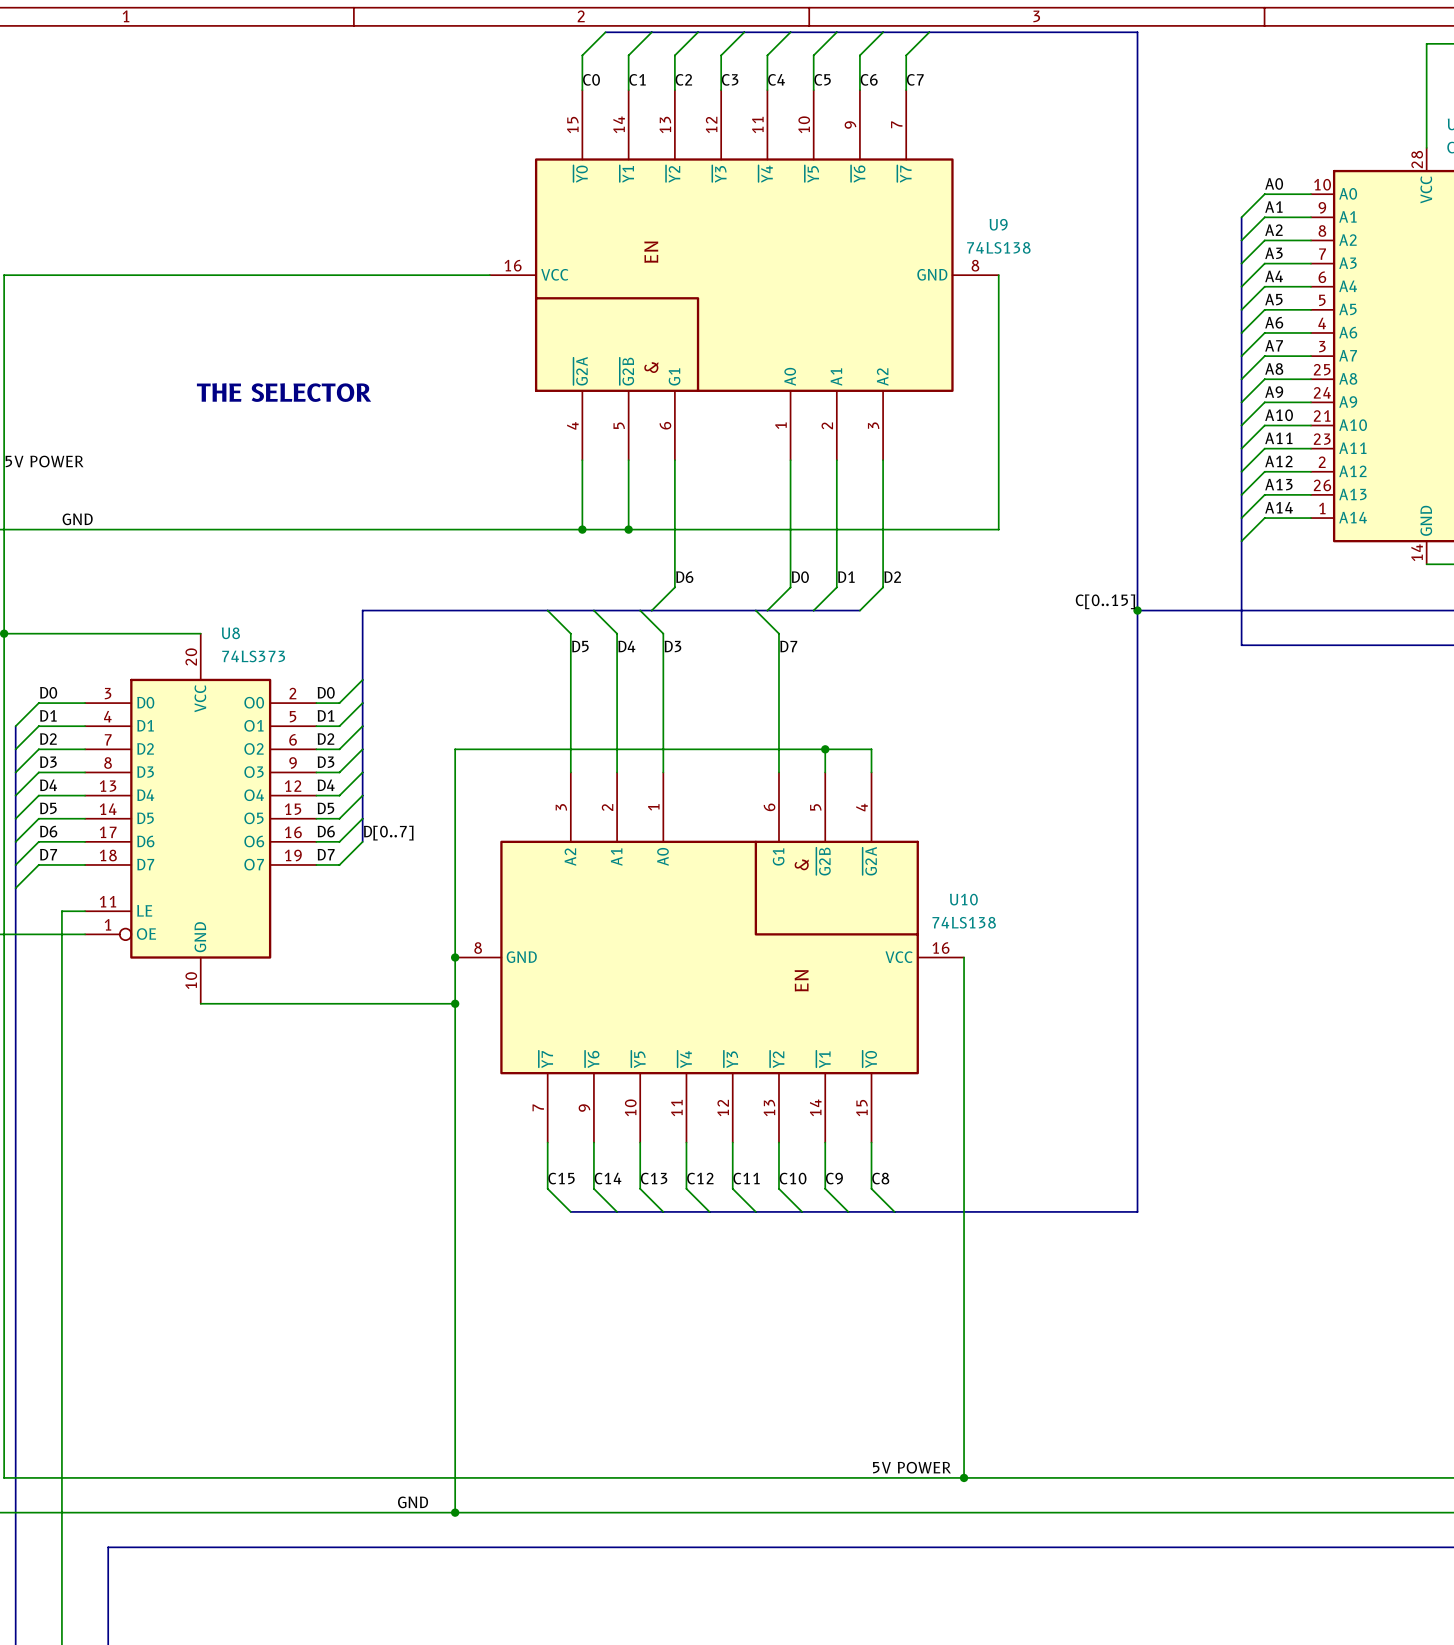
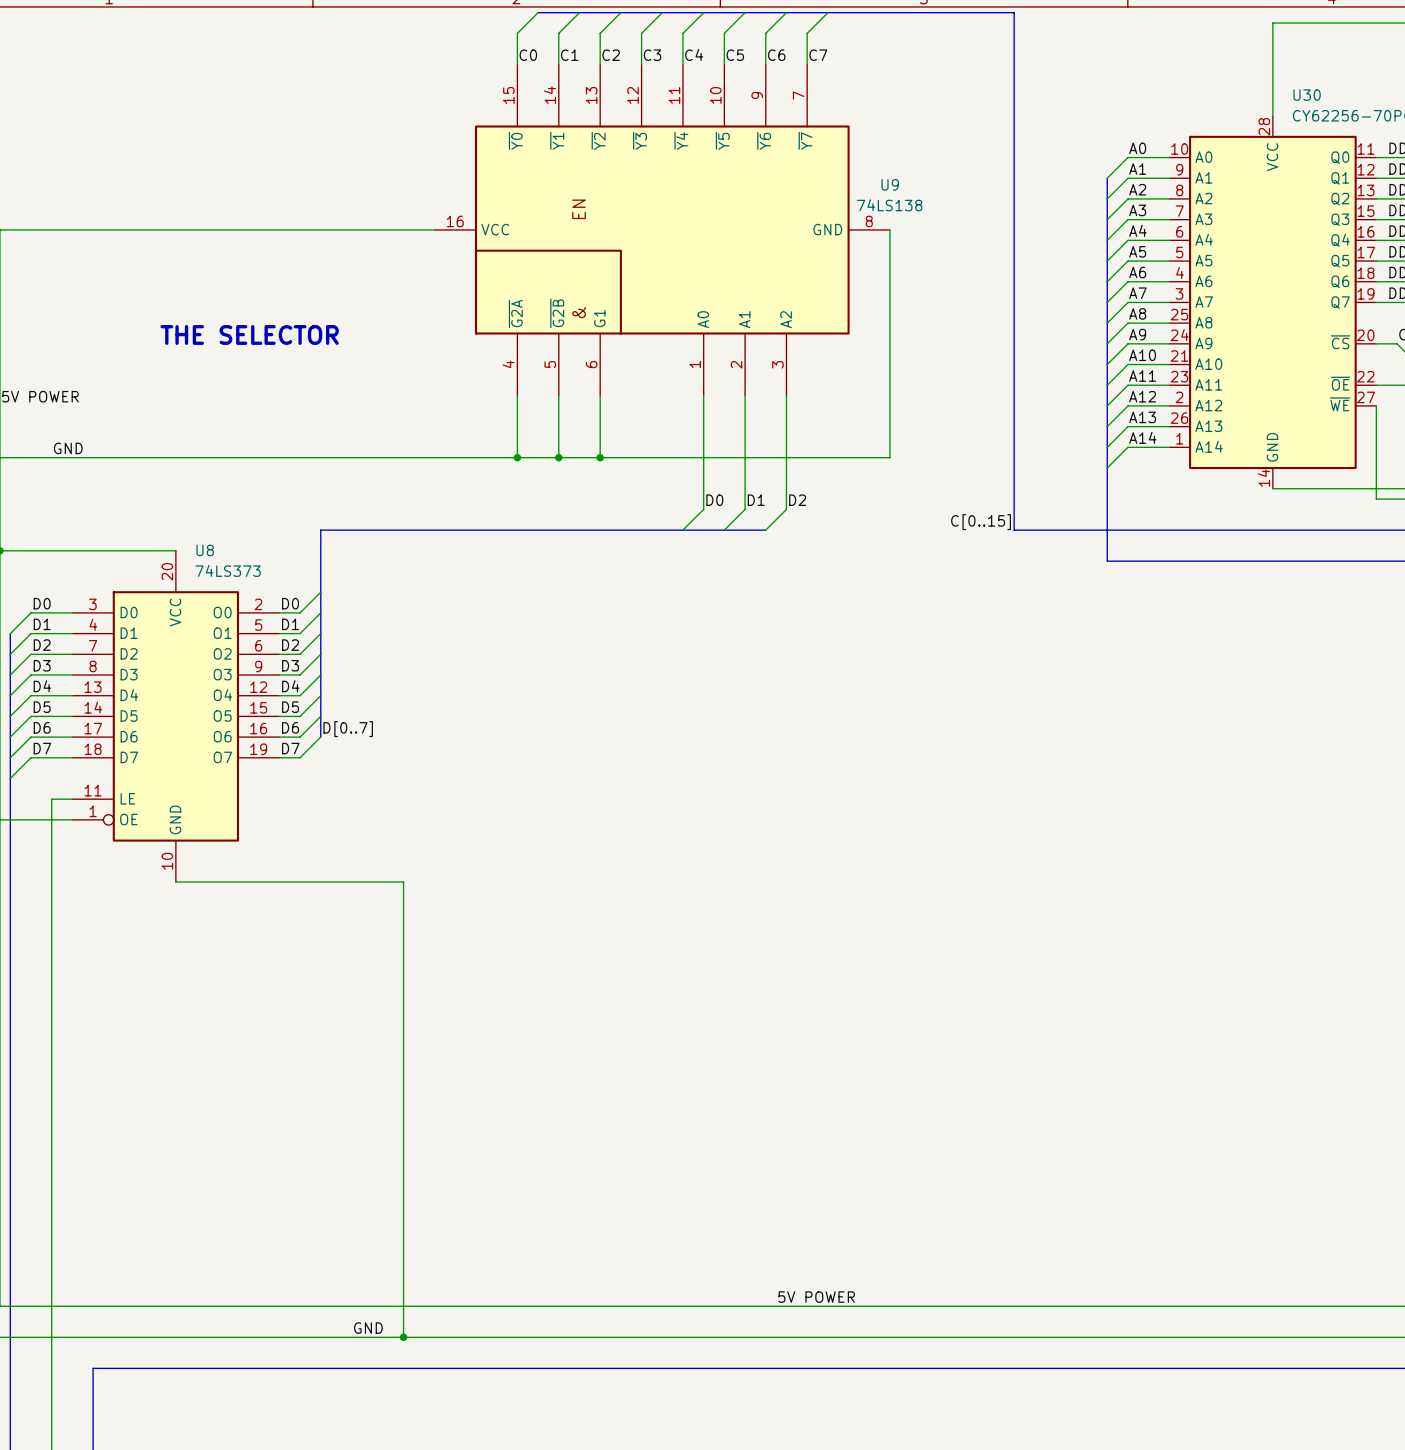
wire: (674, 529) (674, 587) (651, 610) -> none
junction: none -> (600, 457)
label: D6 (684, 577) -> none
wire: (547, 610) (570, 633) (570, 772) -> none
wire: (593, 610) (617, 633) (617, 772) -> none
wire: (640, 610) (663, 633) (663, 772) -> none
wire: (755, 610) (778, 633) (778, 772) -> none
bus: (1137, 610) (1137, 1211) (570, 1211) -> none
junction: (1137, 610) -> none
label: D5 (580, 646) -> none
label: D4 (626, 646) -> none
label: D3 (672, 646) -> none
label: D7 (788, 646) -> none
wire: (825, 749) (825, 772) -> none
junction: (825, 749) -> none
wire: (871, 772) (871, 749) (455, 749) (455, 1003) -> none
junction: (455, 957) -> none
U10: 74LS138 (709, 957) -> none
wire: (964, 957) (964, 1477) -> none
junction: (455, 1003) -> none
wire: (547, 1142) (547, 1188) (570, 1211) -> none
wire: (593, 1142) (593, 1188) (617, 1211) -> none
wire: (640, 1142) (640, 1188) (663, 1211) -> none
wire: (686, 1142) (686, 1188) (709, 1211) -> none
wire: (732, 1142) (732, 1188) (755, 1211) -> none
wire: (778, 1142) (778, 1188) (802, 1211) -> none
wire: (825, 1142) (825, 1188) (848, 1211) -> none
wire: (871, 1142) (871, 1188) (894, 1211) -> none
label: C15 (561, 1178) -> none
label: C14 (607, 1178) -> none
label: C13 (654, 1178) -> none
label: C12 (700, 1178) -> none
label: C11 (746, 1178) -> none
label: C10 (793, 1178) -> none
label: C9 (834, 1178) -> none
label: C8 (880, 1178) -> none
junction: (964, 1477) -> none

